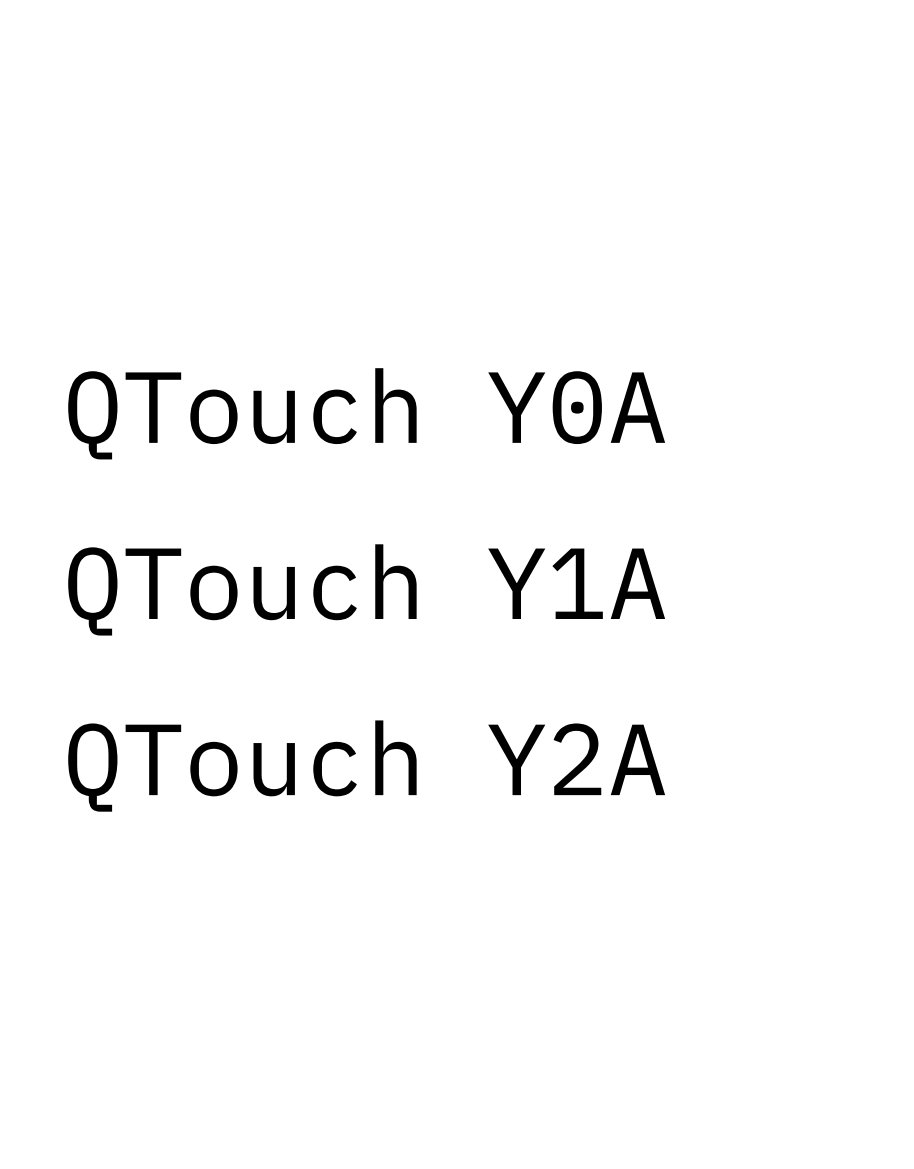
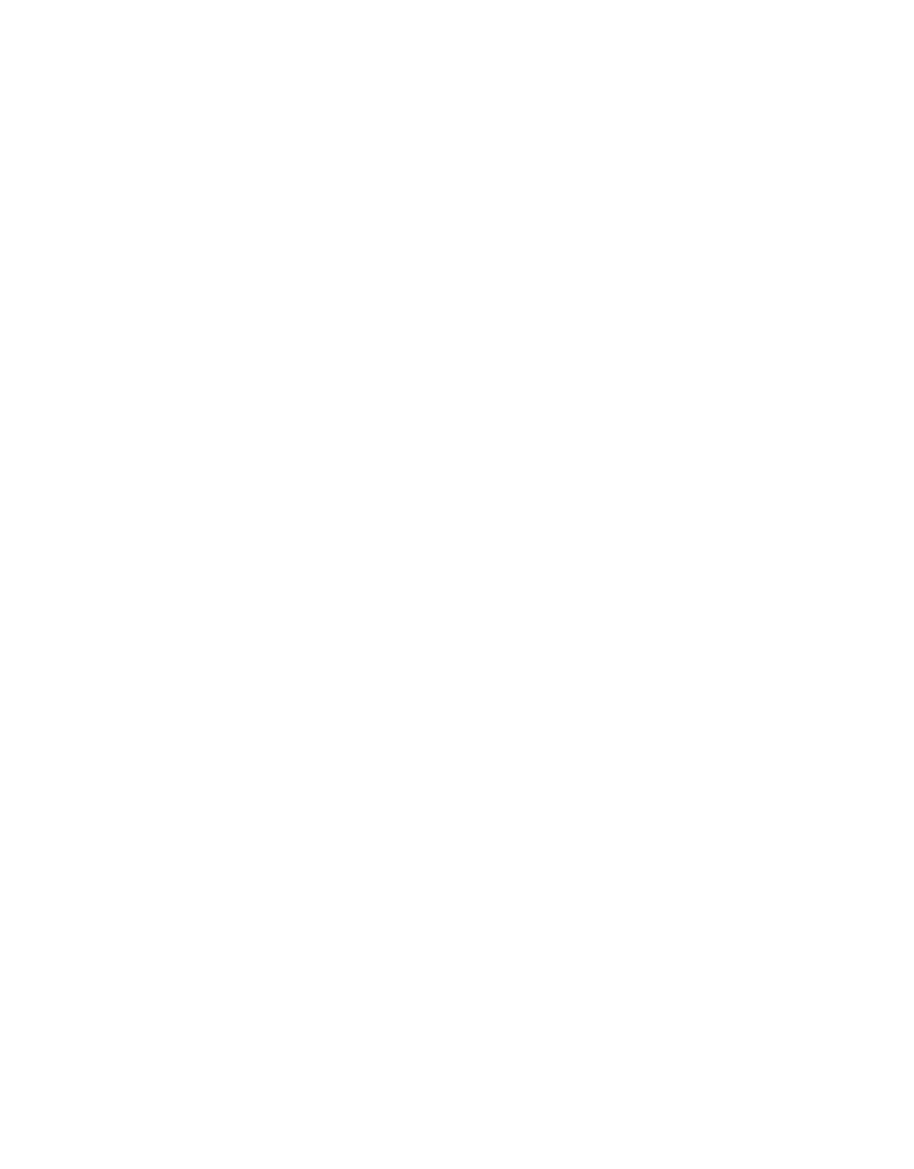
text: QTouch Y0A (366, 413) -> none
text: QTouch Y1A (366, 589) -> none
text: QTouch Y2A (366, 766) -> none

